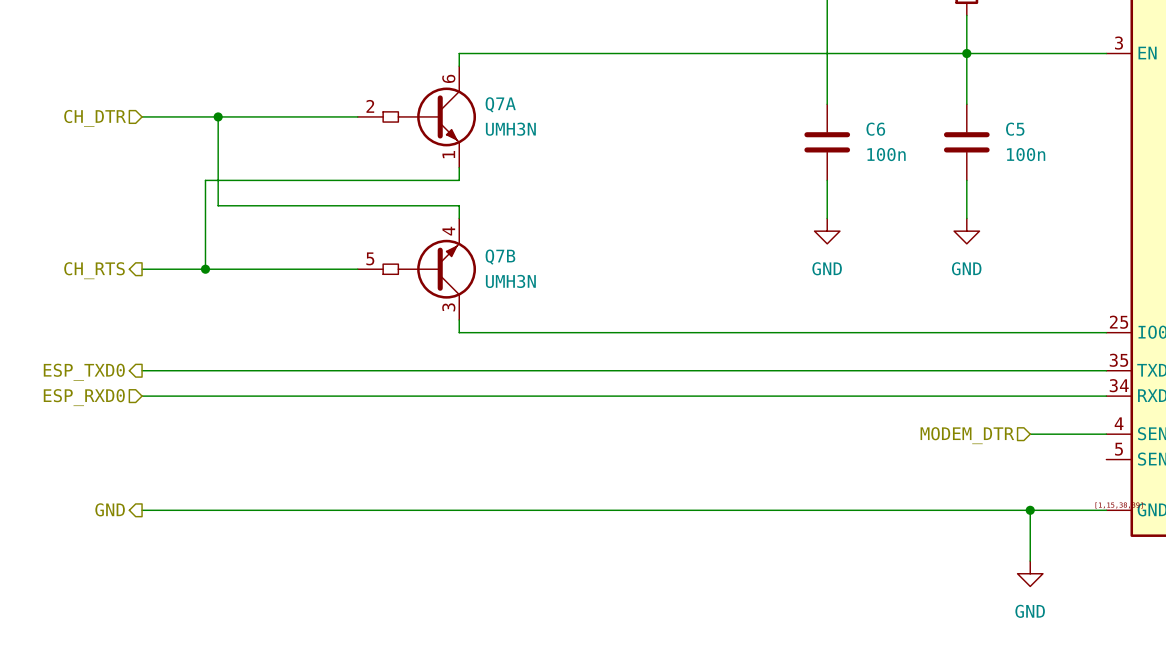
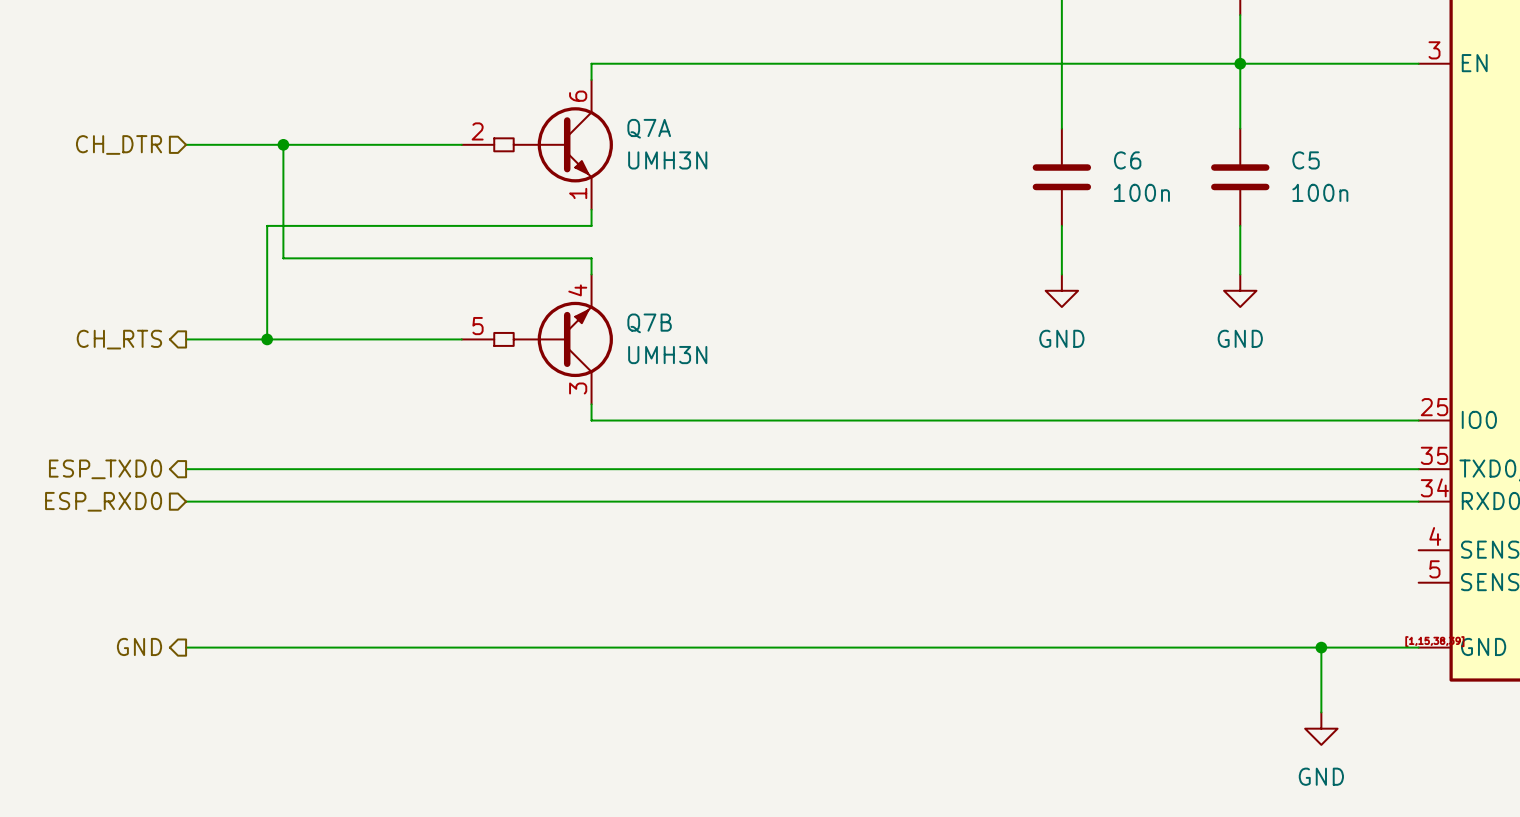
wire: (1030, 434) (1106, 434) -> none
hierarchical label: MODEM_DTR (967, 435) -> none

